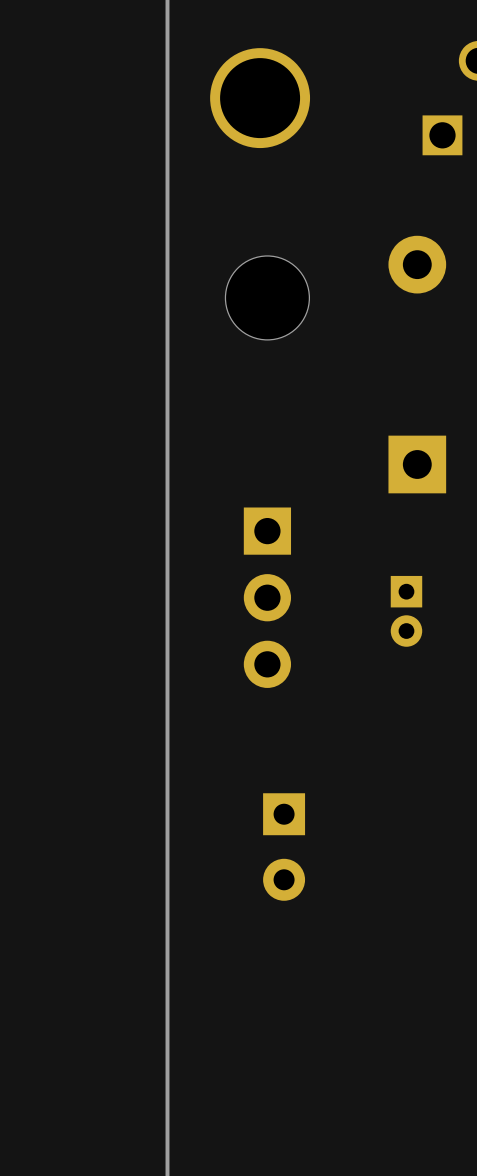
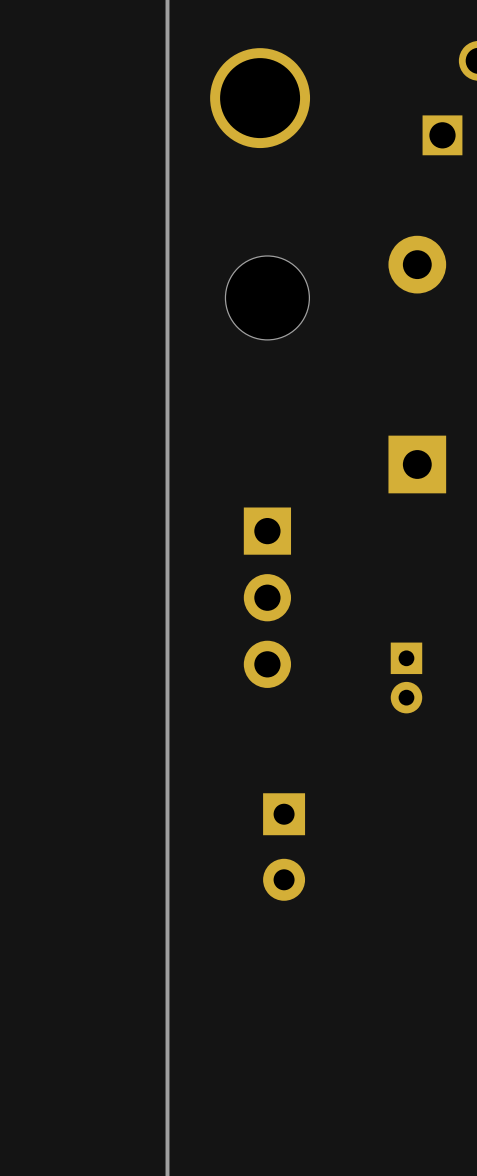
part position: (406, 611) -> (406, 677)

